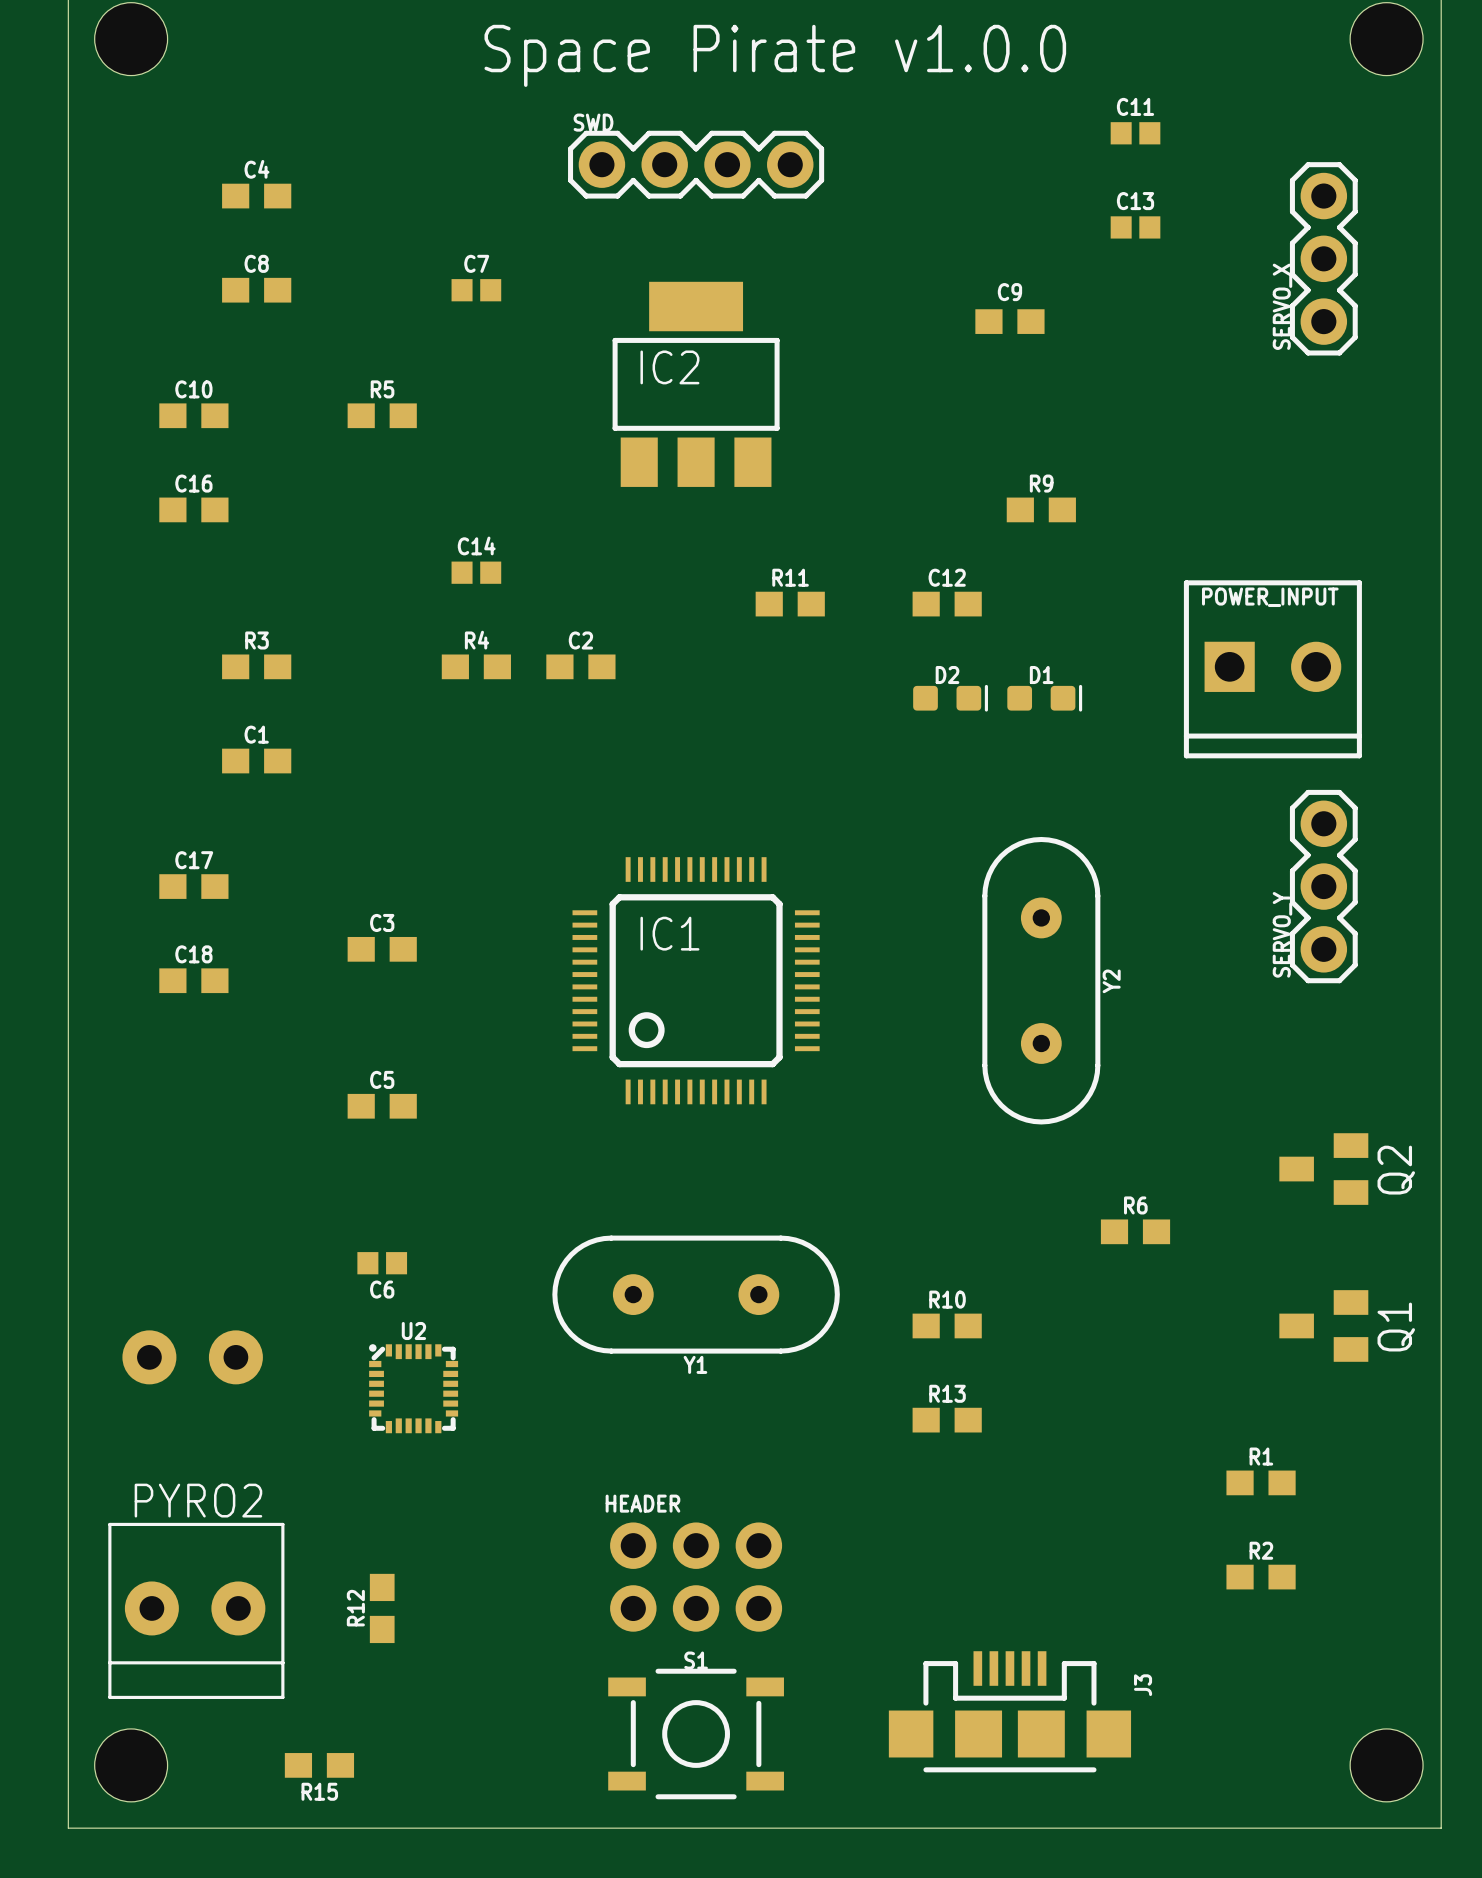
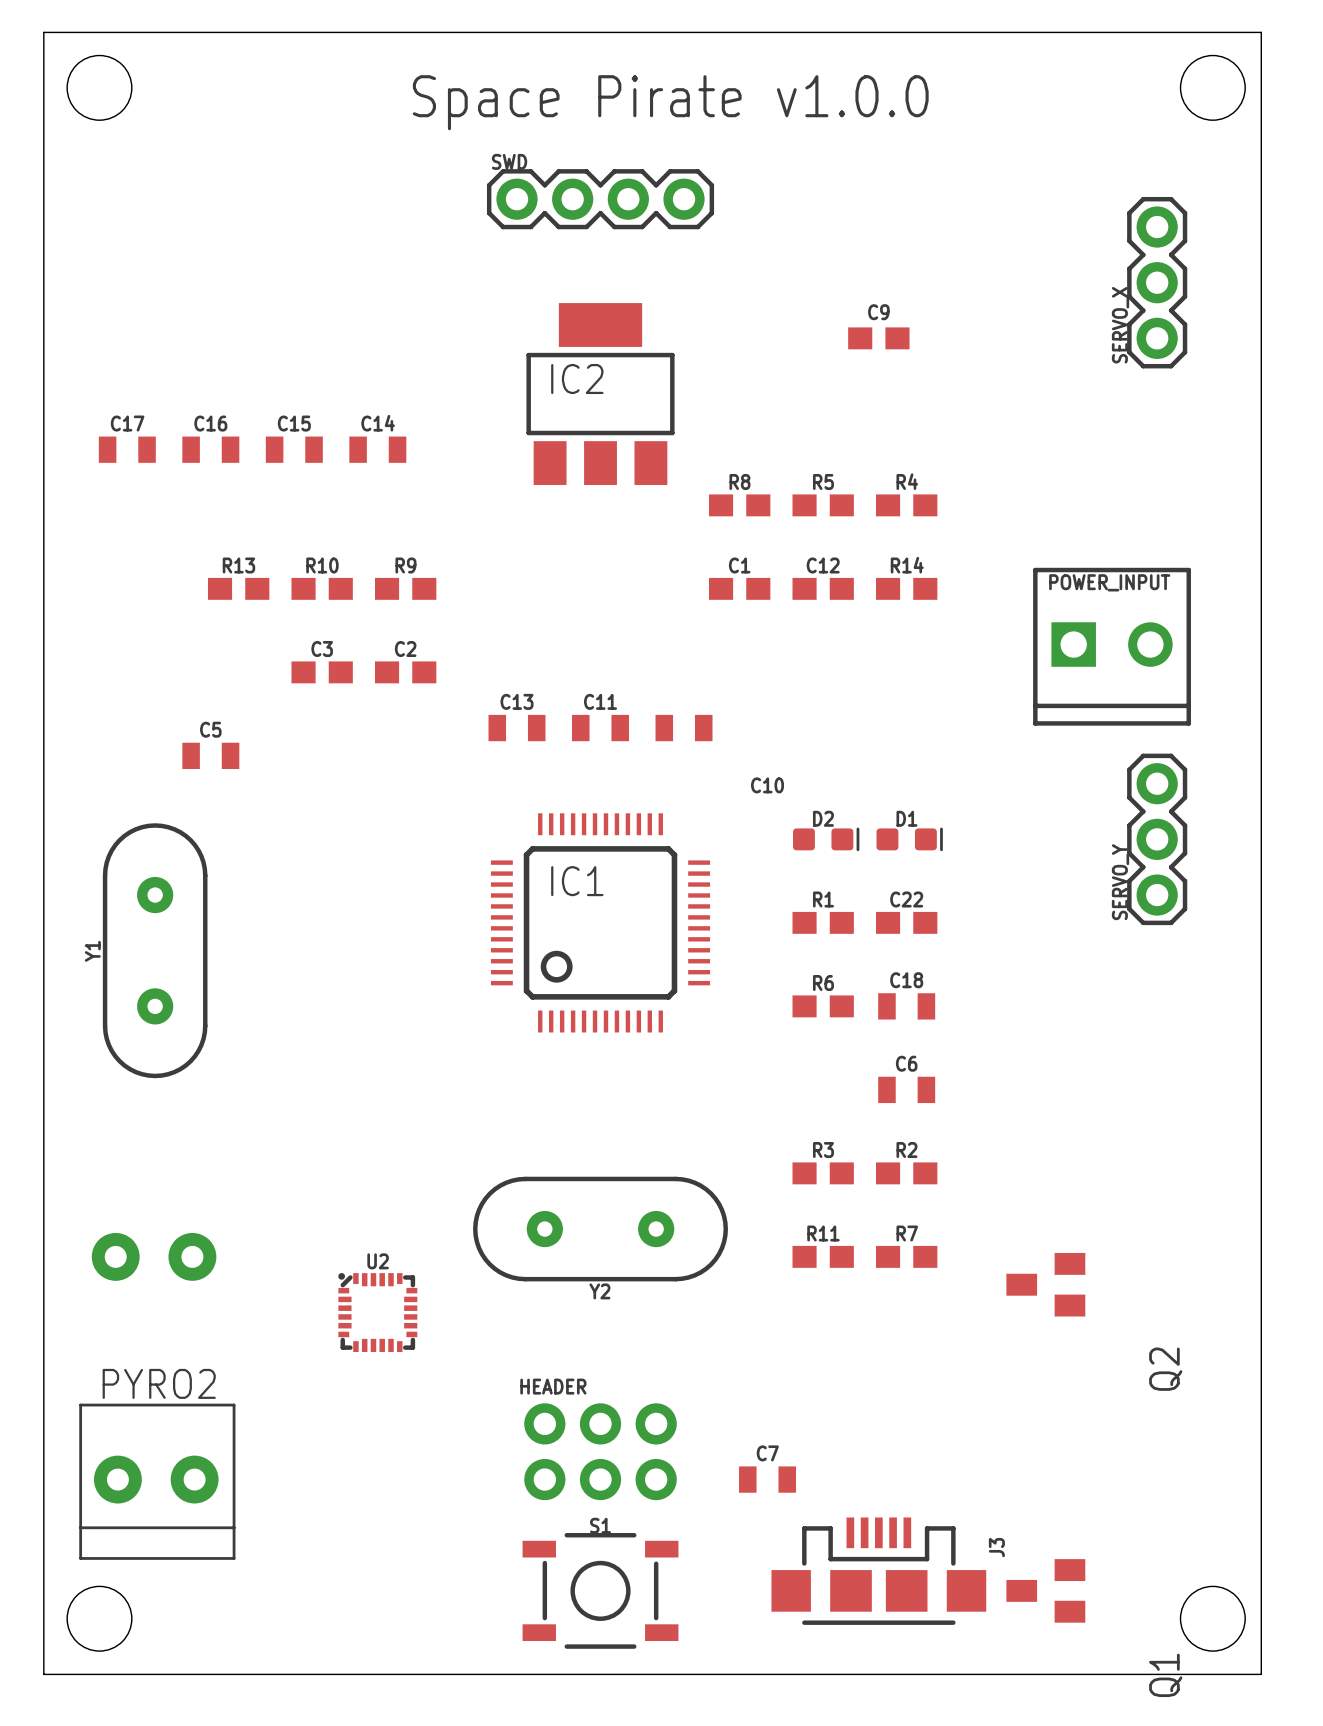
C11 footprint: [1110, 122, 1161, 145] -> [572, 714, 630, 742]
C4: (256, 196) -> none
C13 footprint: [1110, 216, 1161, 239] -> [488, 714, 546, 742]
C7 footprint: [451, 279, 502, 302] -> [739, 1466, 797, 1493]
C8: (256, 290) -> none
C10 name position: C10 (193, 389) -> C10 (767, 785)
C10 footprint: [159, 403, 229, 429] -> [655, 714, 713, 742]
R5 position: (382, 415) -> (823, 505)
C15: none -> (294, 449)
R9 name: R9 (1041, 483) -> R4 (907, 481)
C16 footprint: [159, 497, 229, 523] -> [182, 436, 240, 463]
R8: none -> (739, 505)
C14 footprint: [451, 561, 502, 584] -> [349, 436, 407, 463]
R9: none -> (405, 588)
R11 position: (790, 604) -> (823, 1256)
R14: none -> (906, 588)
R3 position: (256, 666) -> (823, 1173)
R4: (476, 666) -> none
C2 position: (580, 666) -> (405, 672)
D2 position: (950, 698) -> (826, 839)
D1 position: (1044, 698) -> (909, 839)
C1 position: (256, 761) -> (739, 588)
C17 footprint: [159, 874, 229, 899] -> [98, 436, 156, 463]
C3 position: (382, 949) -> (322, 672)
C18 footprint: [159, 968, 229, 994] -> [878, 993, 936, 1020]
Y2 rotation: 0° (1041, 980) -> 90° clockwise (600, 1229)
Y2 position: (1041, 980) -> (600, 1229)
C22: none -> (906, 922)
C5 footprint: [347, 1093, 417, 1119] -> [182, 742, 240, 770]
Q2 position: (1323, 1169) -> (1045, 1284)
Q2 name position: Q2 (1396, 1170) -> Q2 (1165, 1369)
R6 position: (1135, 1231) -> (823, 1006)
C6 footprint: [357, 1252, 408, 1275] -> [878, 1076, 936, 1104]
C6 name position: C6 (382, 1289) -> C6 (906, 1063)
Y1 rotation: 0° (696, 1294) -> 90° clockwise (155, 950)
Y1 position: (696, 1294) -> (155, 950)
R10 position: (947, 1325) -> (322, 588)
Q1 position: (1323, 1325) -> (1045, 1590)
Q1 name position: Q1 (1396, 1327) -> Q1 (1165, 1675)
R7: none -> (906, 1256)
U2 position: (413, 1388) -> (377, 1312)
R13 position: (947, 1420) -> (238, 588)
R1 position: (1261, 1482) -> (823, 922)
R2 position: (1261, 1577) -> (906, 1173)
R12: (382, 1608) -> none
R15: (319, 1765) -> none

